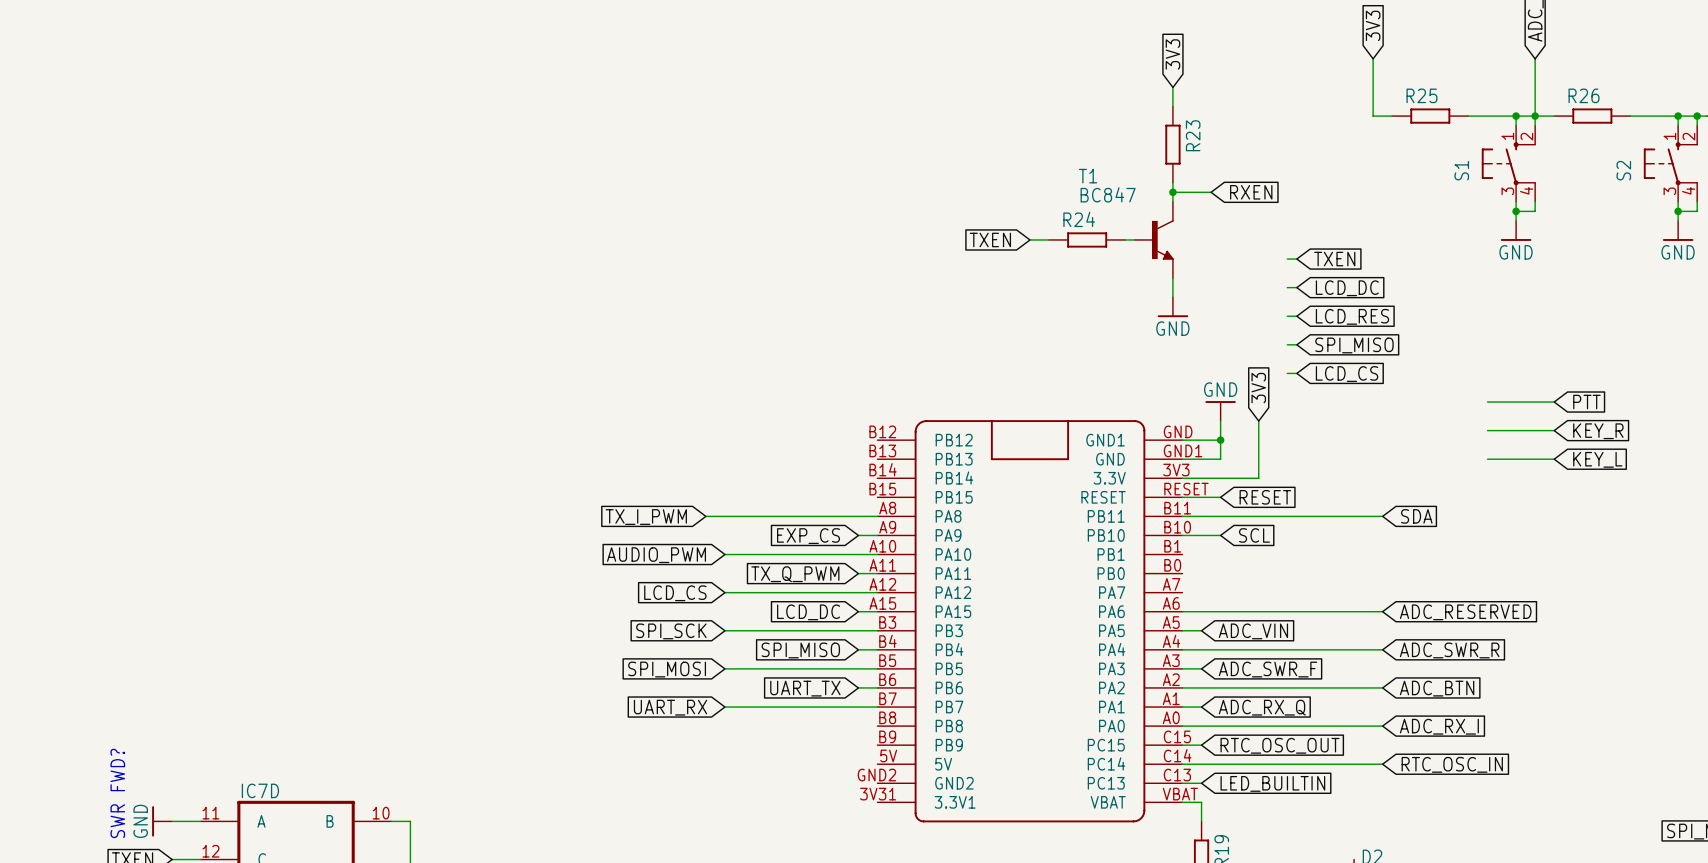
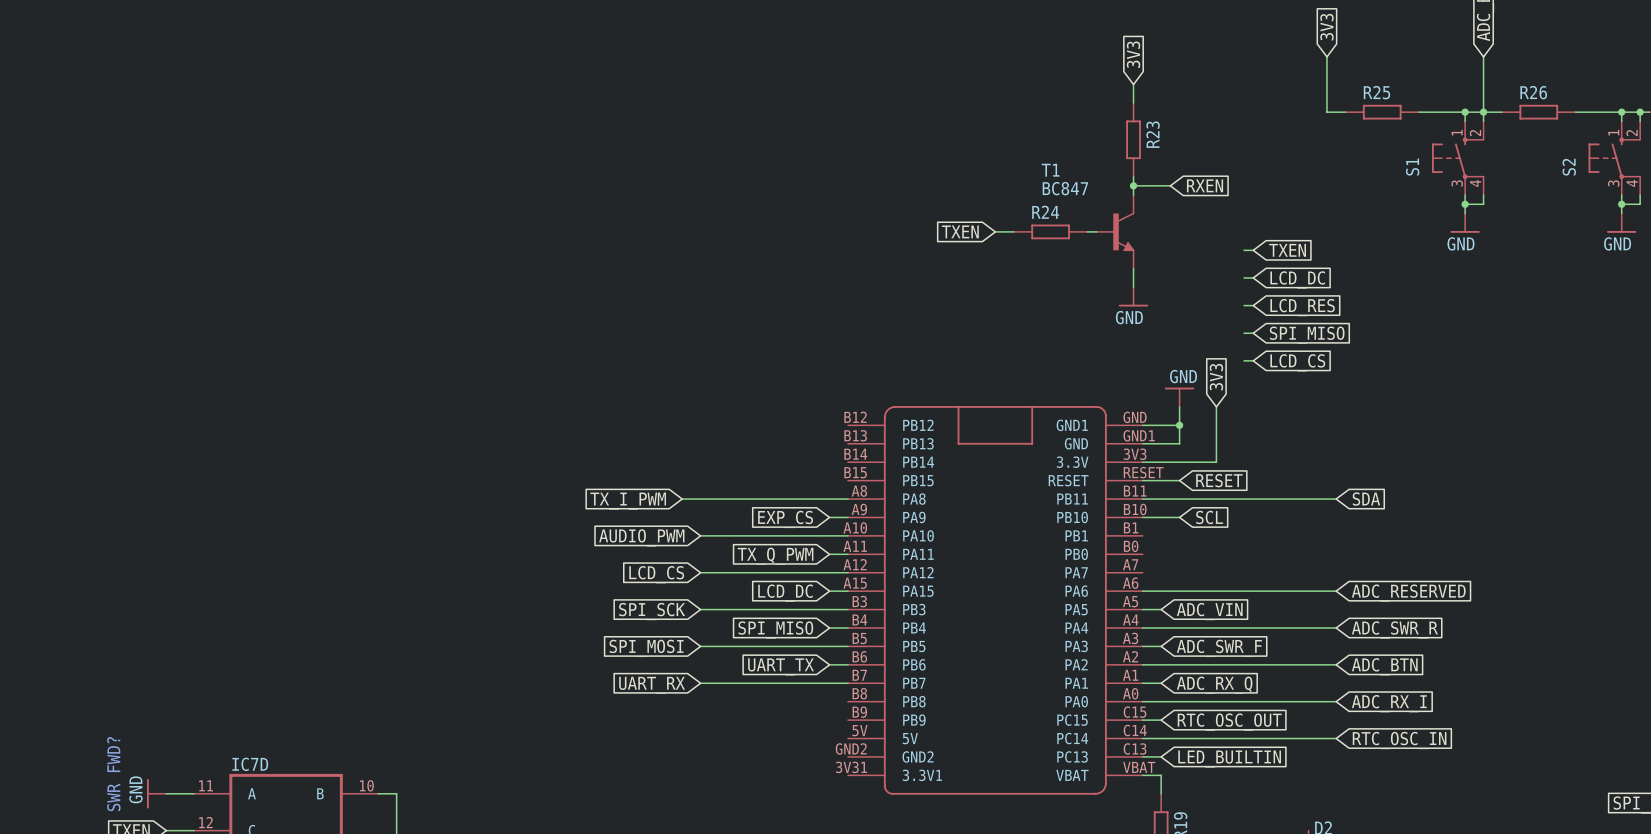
wire: (1487, 402) (1554, 402) -> none
global label: PTT (1586, 402) -> none
wire: (1487, 430) (1554, 430) -> none
global label: KEY_R (1598, 431) -> none
wire: (1487, 459) (1554, 459) -> none
global label: KEY_L (1597, 459) -> none

